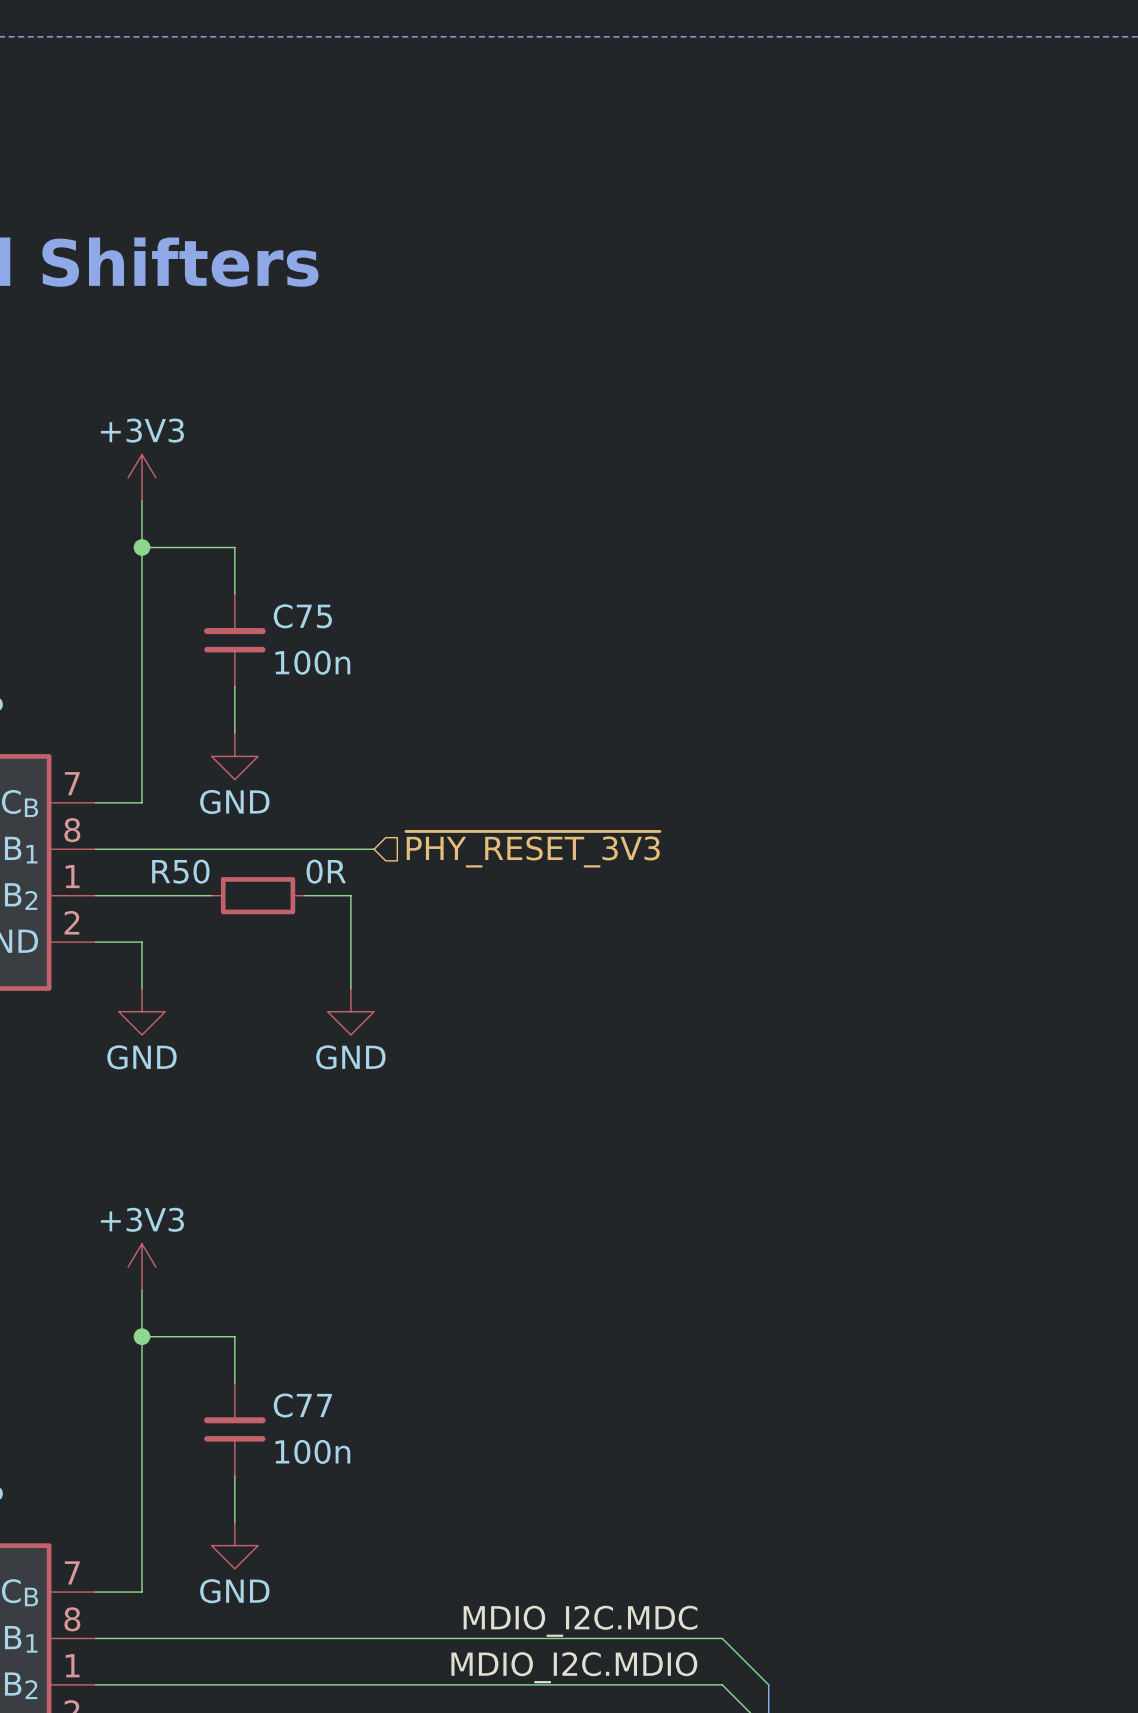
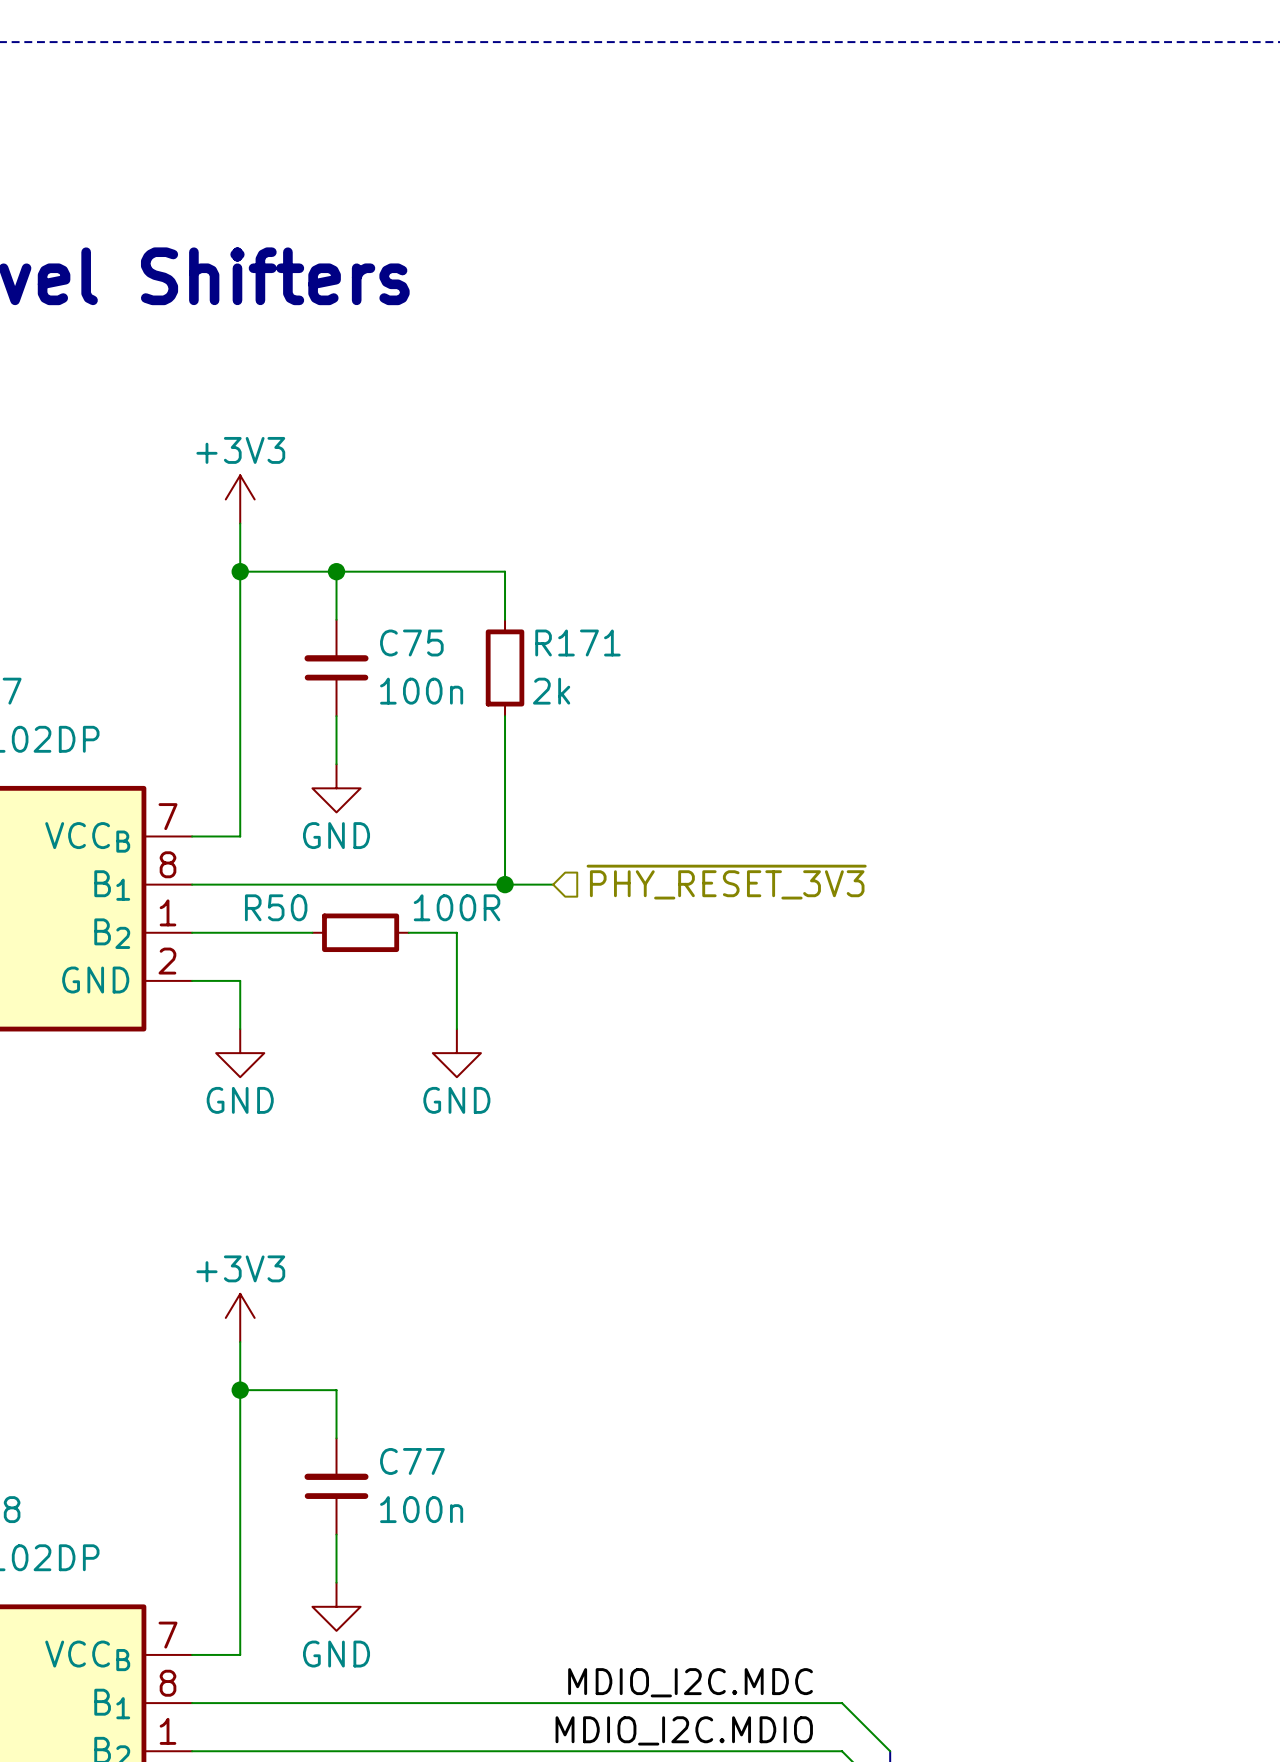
wire: none -> (336, 571) (505, 571) (505, 619)
junction: none -> (336, 571)
R171: none -> (505, 667)
wire: none -> (505, 716) (505, 884)
wire: none -> (480, 884) (553, 884)
junction: none -> (505, 884)
hierarchical label position: ~{PHY_RESET_3V3} (532, 849) -> ~{PHY_RESET_3V3} (726, 882)
R50 text: 0R (326, 871) -> 100R (457, 907)

